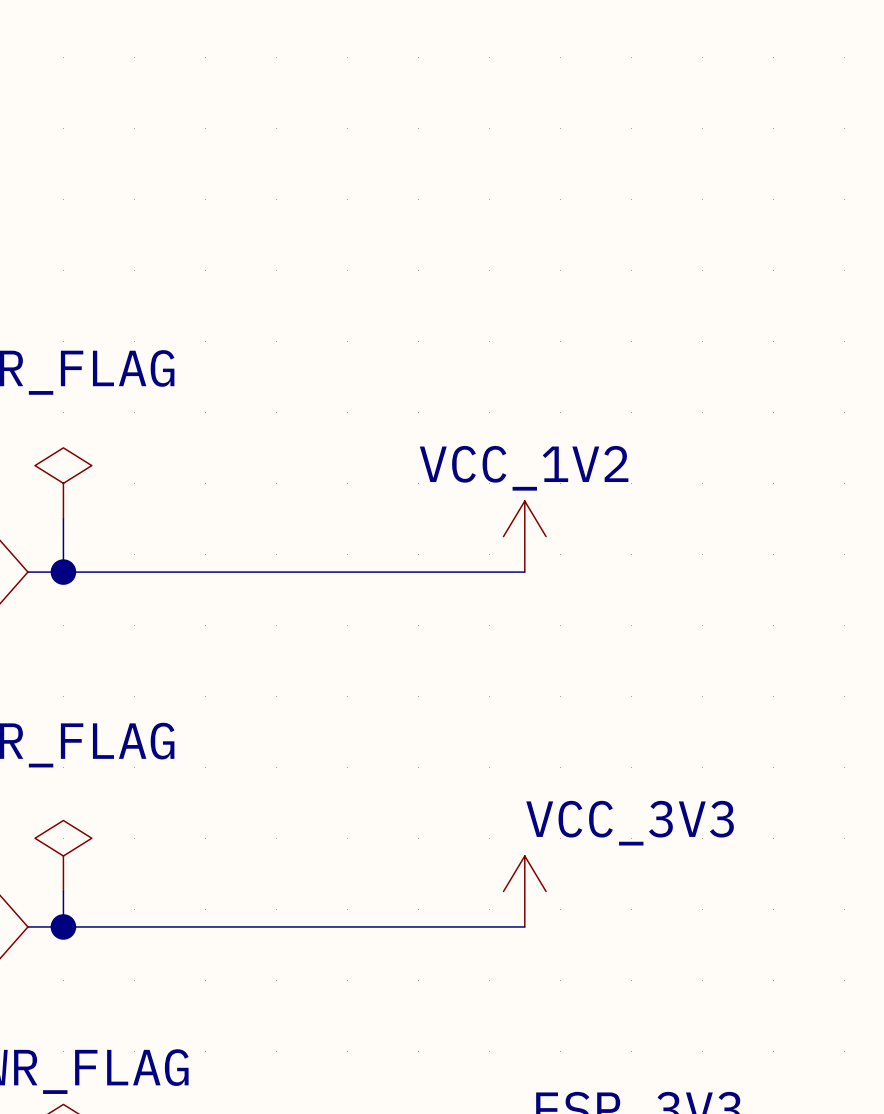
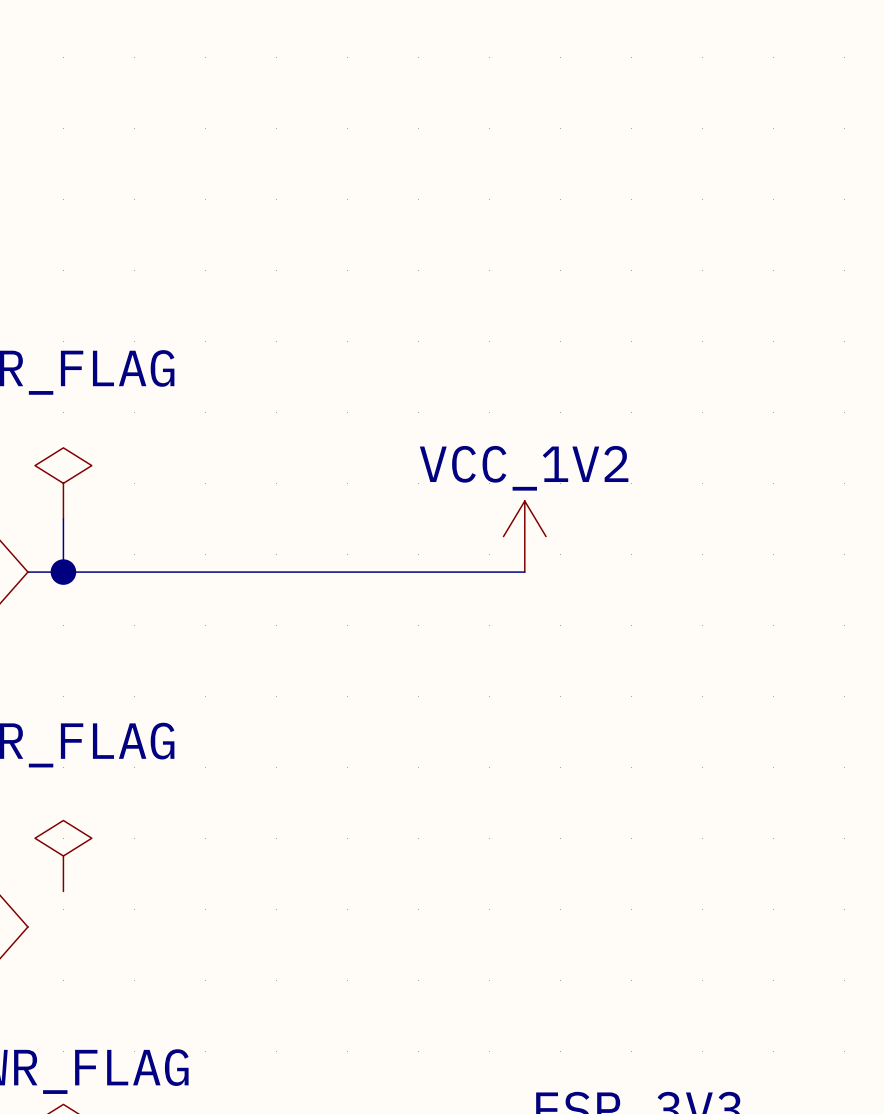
wire: (63, 891) (63, 926) -> none
power symbol: VCC_3V3 (524, 891) -> none
wire: (27, 926) (524, 926) -> none
junction: (63, 926) -> none

